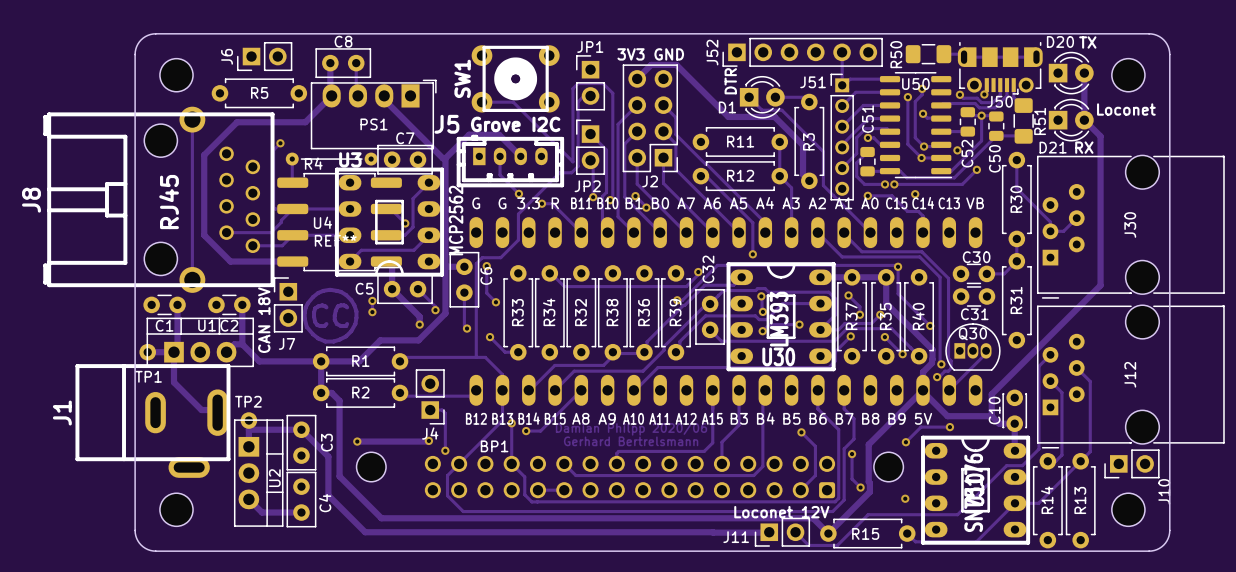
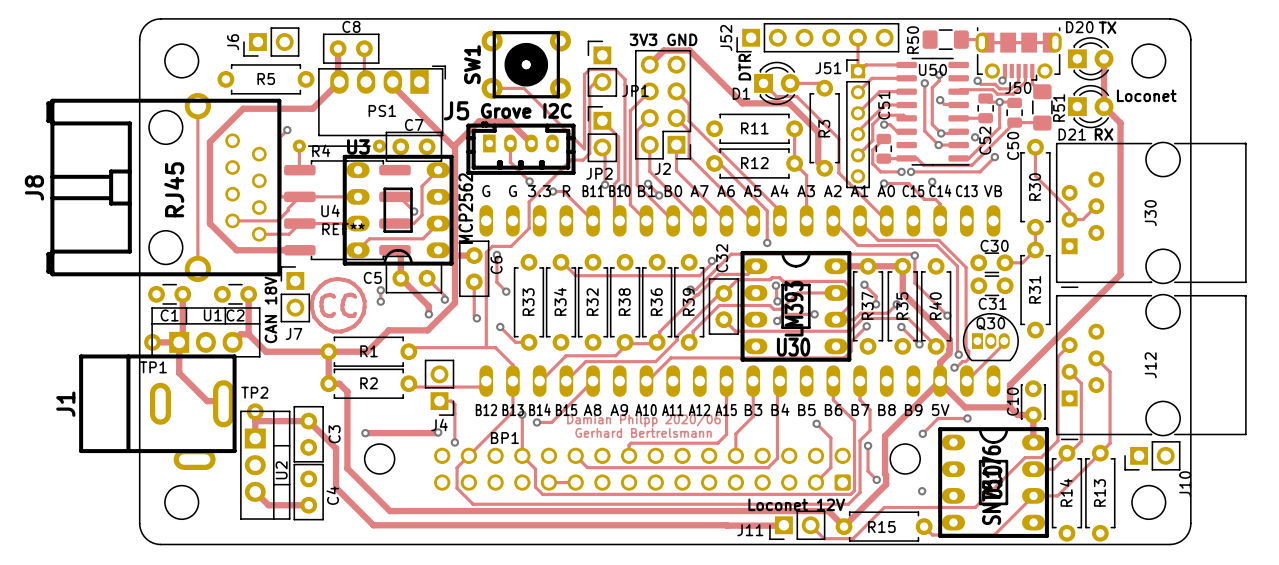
JP1 name position: JP1 (590, 46) -> JP1 (635, 91)
track: (1061, 449) (1061, 455) (1055, 461) (1047, 461) -> (1081, 441) (1053, 469) (1033, 469)

